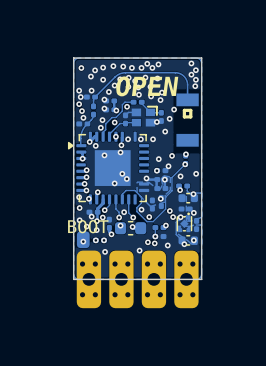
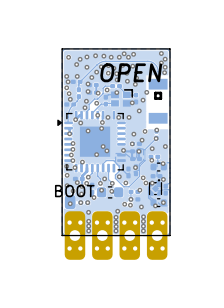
via: none -> (116, 92)
via: none -> (116, 217)
via: none -> (143, 216)
via: none -> (88, 221)
via: none -> (143, 221)
via: none -> (116, 222)
via: none -> (88, 226)
via: none -> (116, 226)
via: none -> (143, 226)
via: none -> (88, 230)
via: none -> (116, 230)
via: none -> (143, 230)

